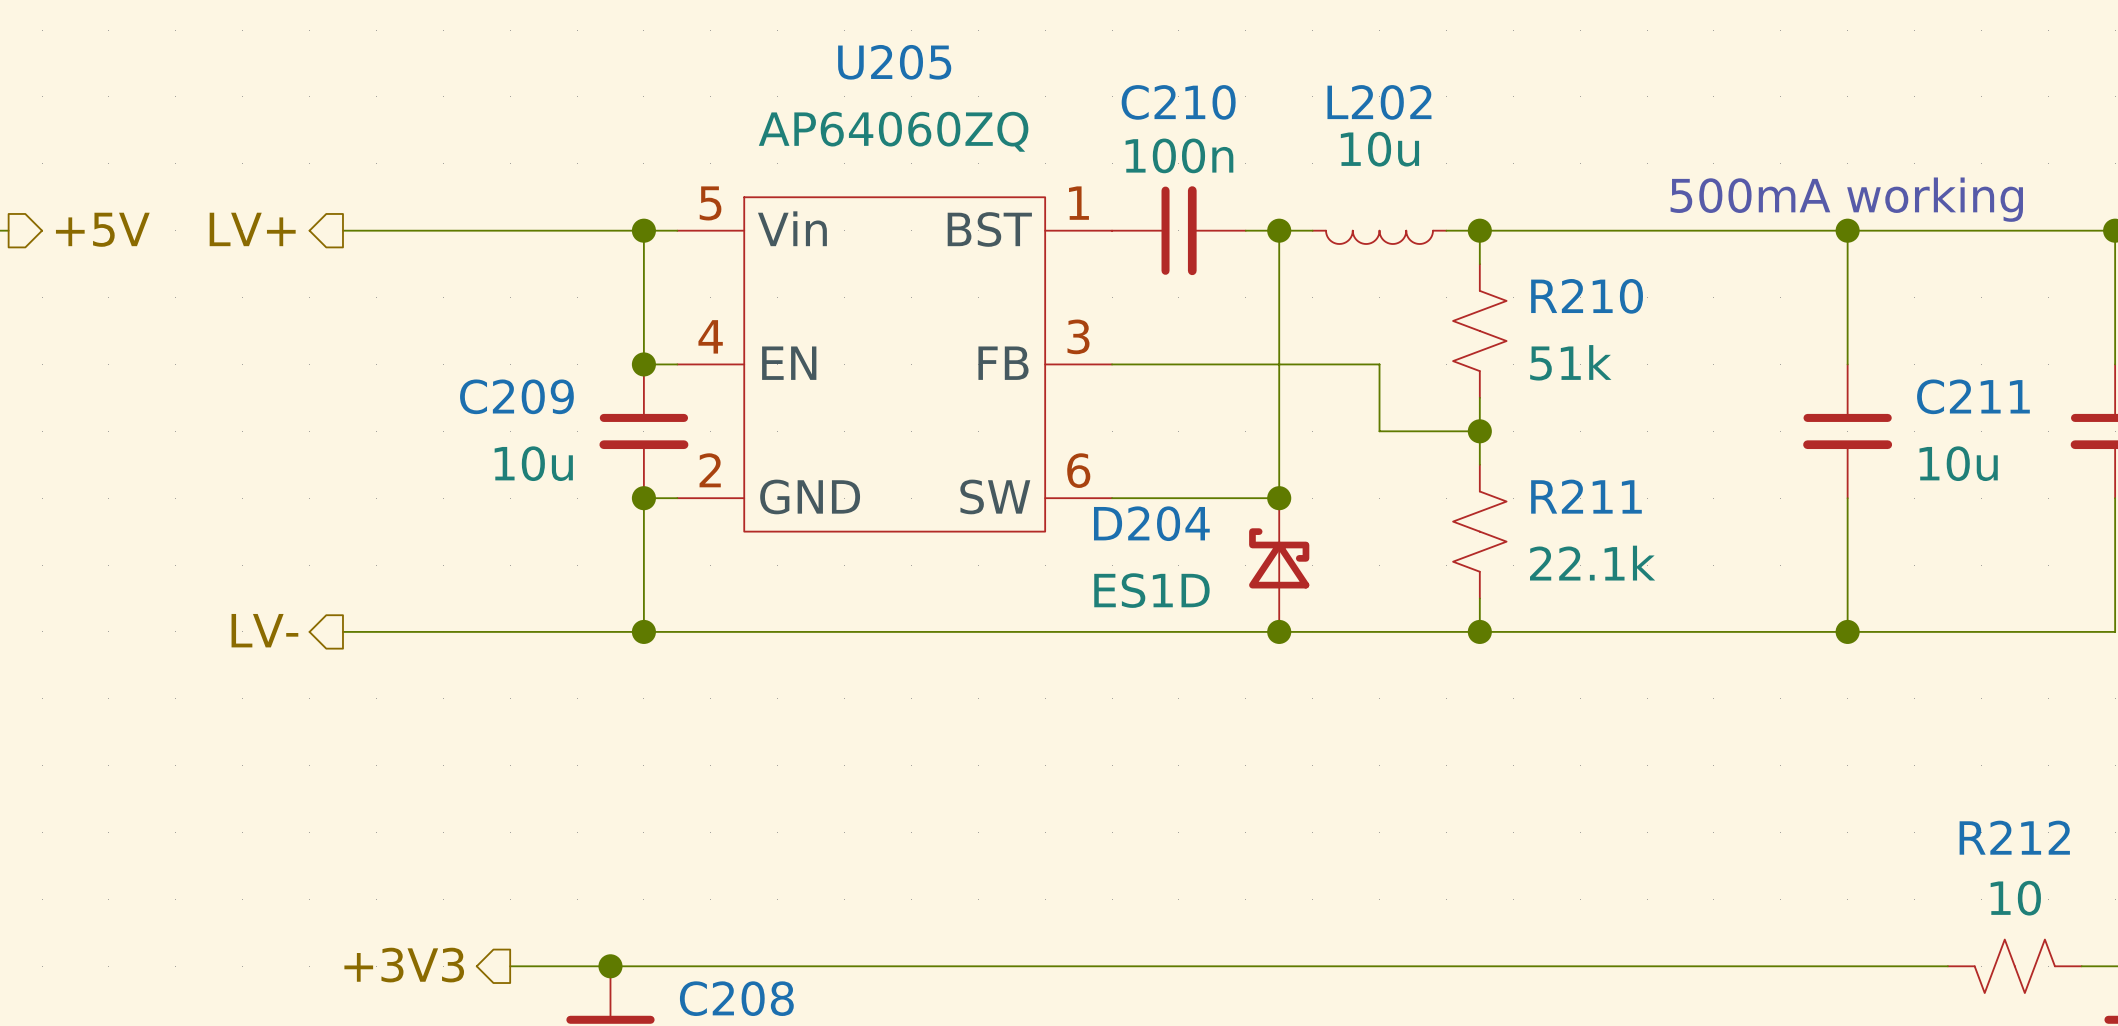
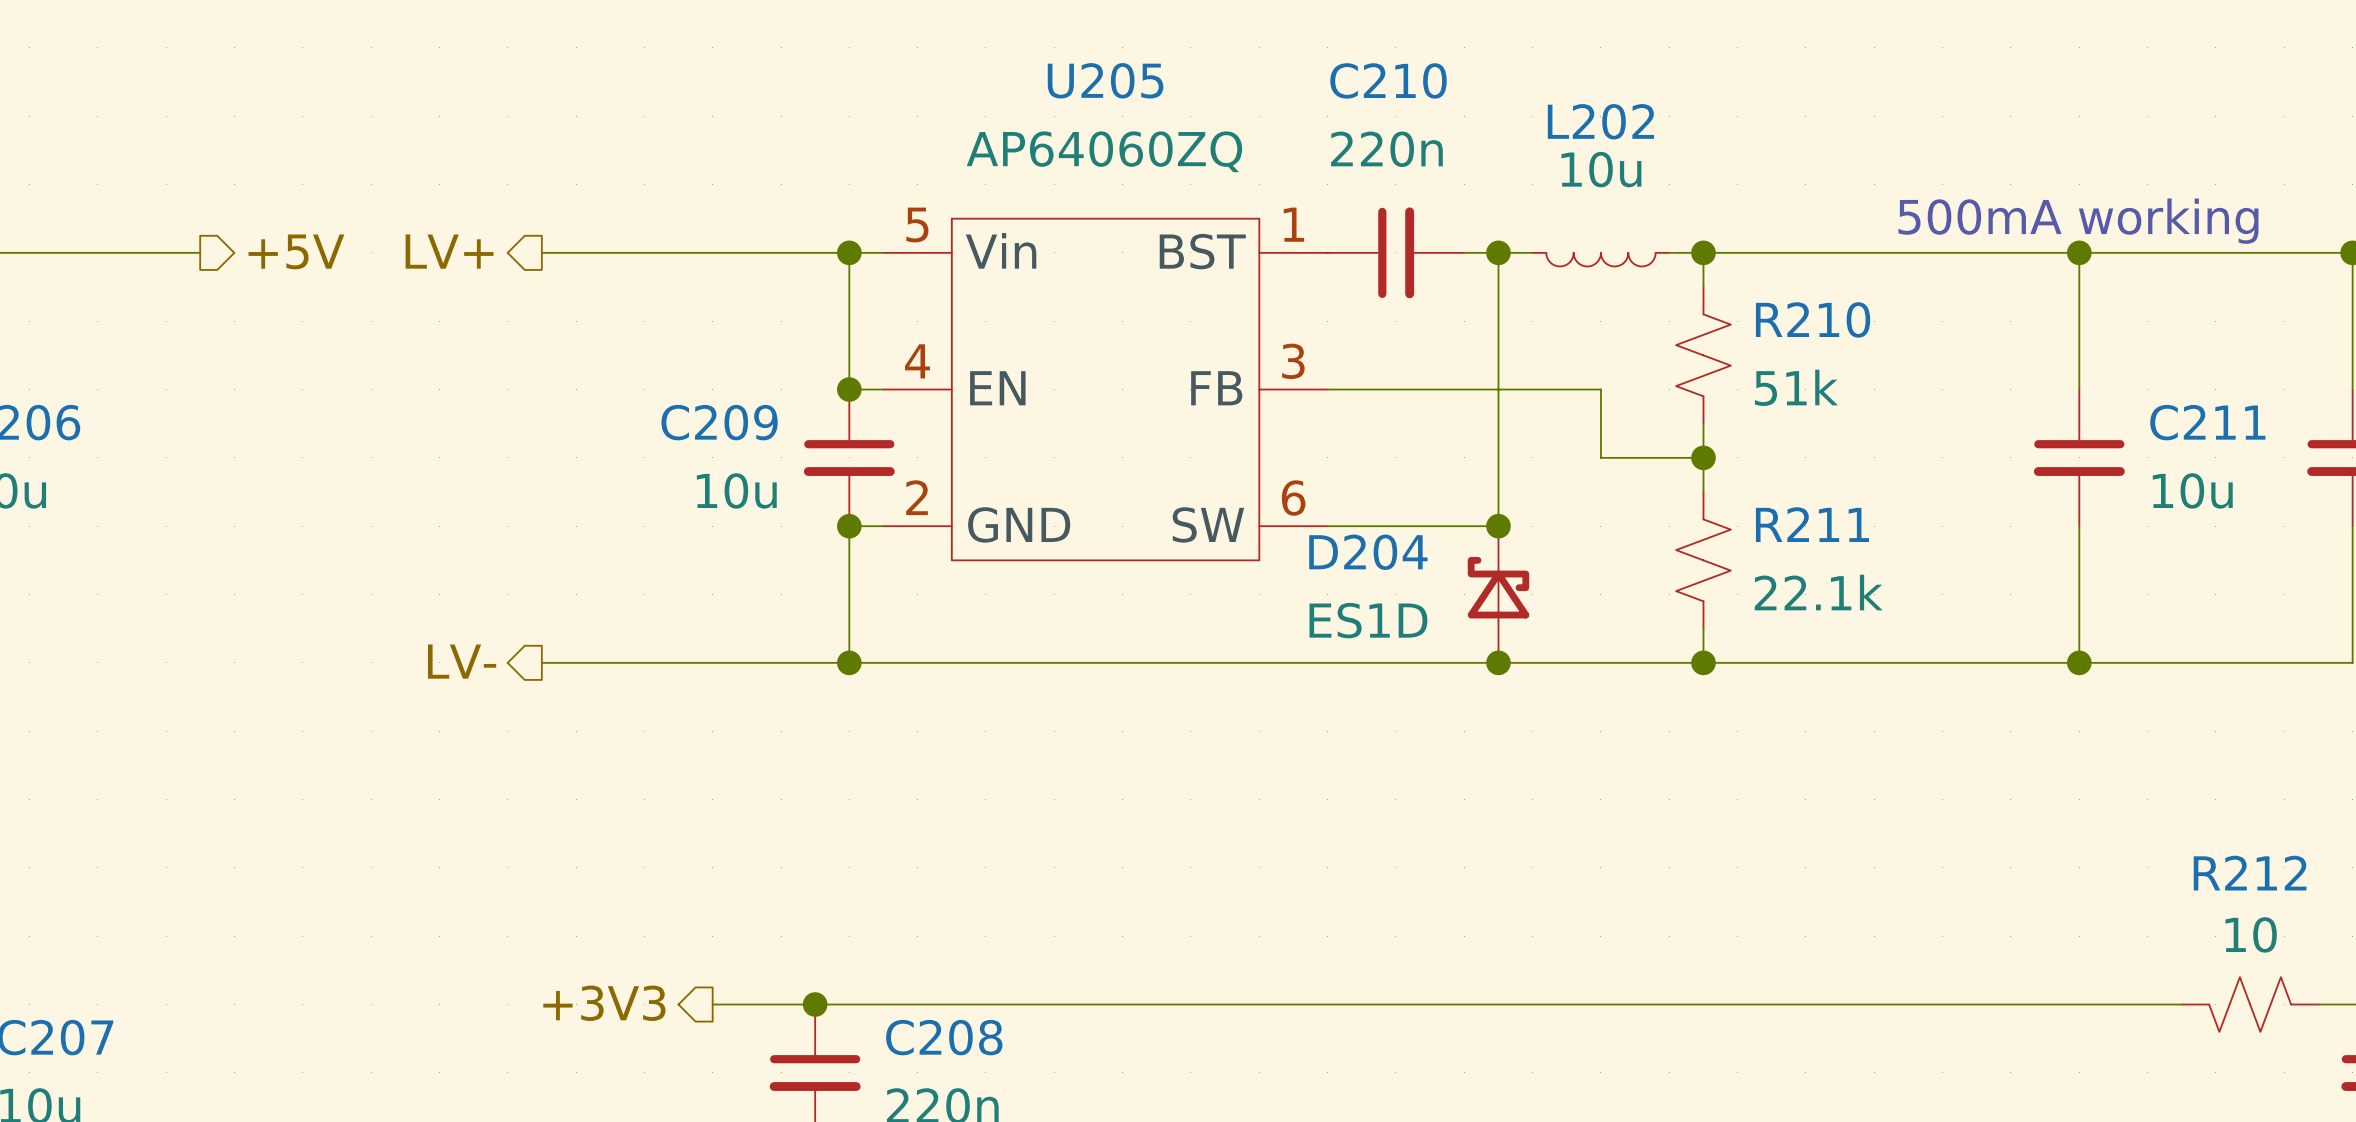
C210 name position: C210 (1178, 102) -> C210 (1388, 80)
C210 value: 100n (1179, 155) -> 220n (1386, 149)

